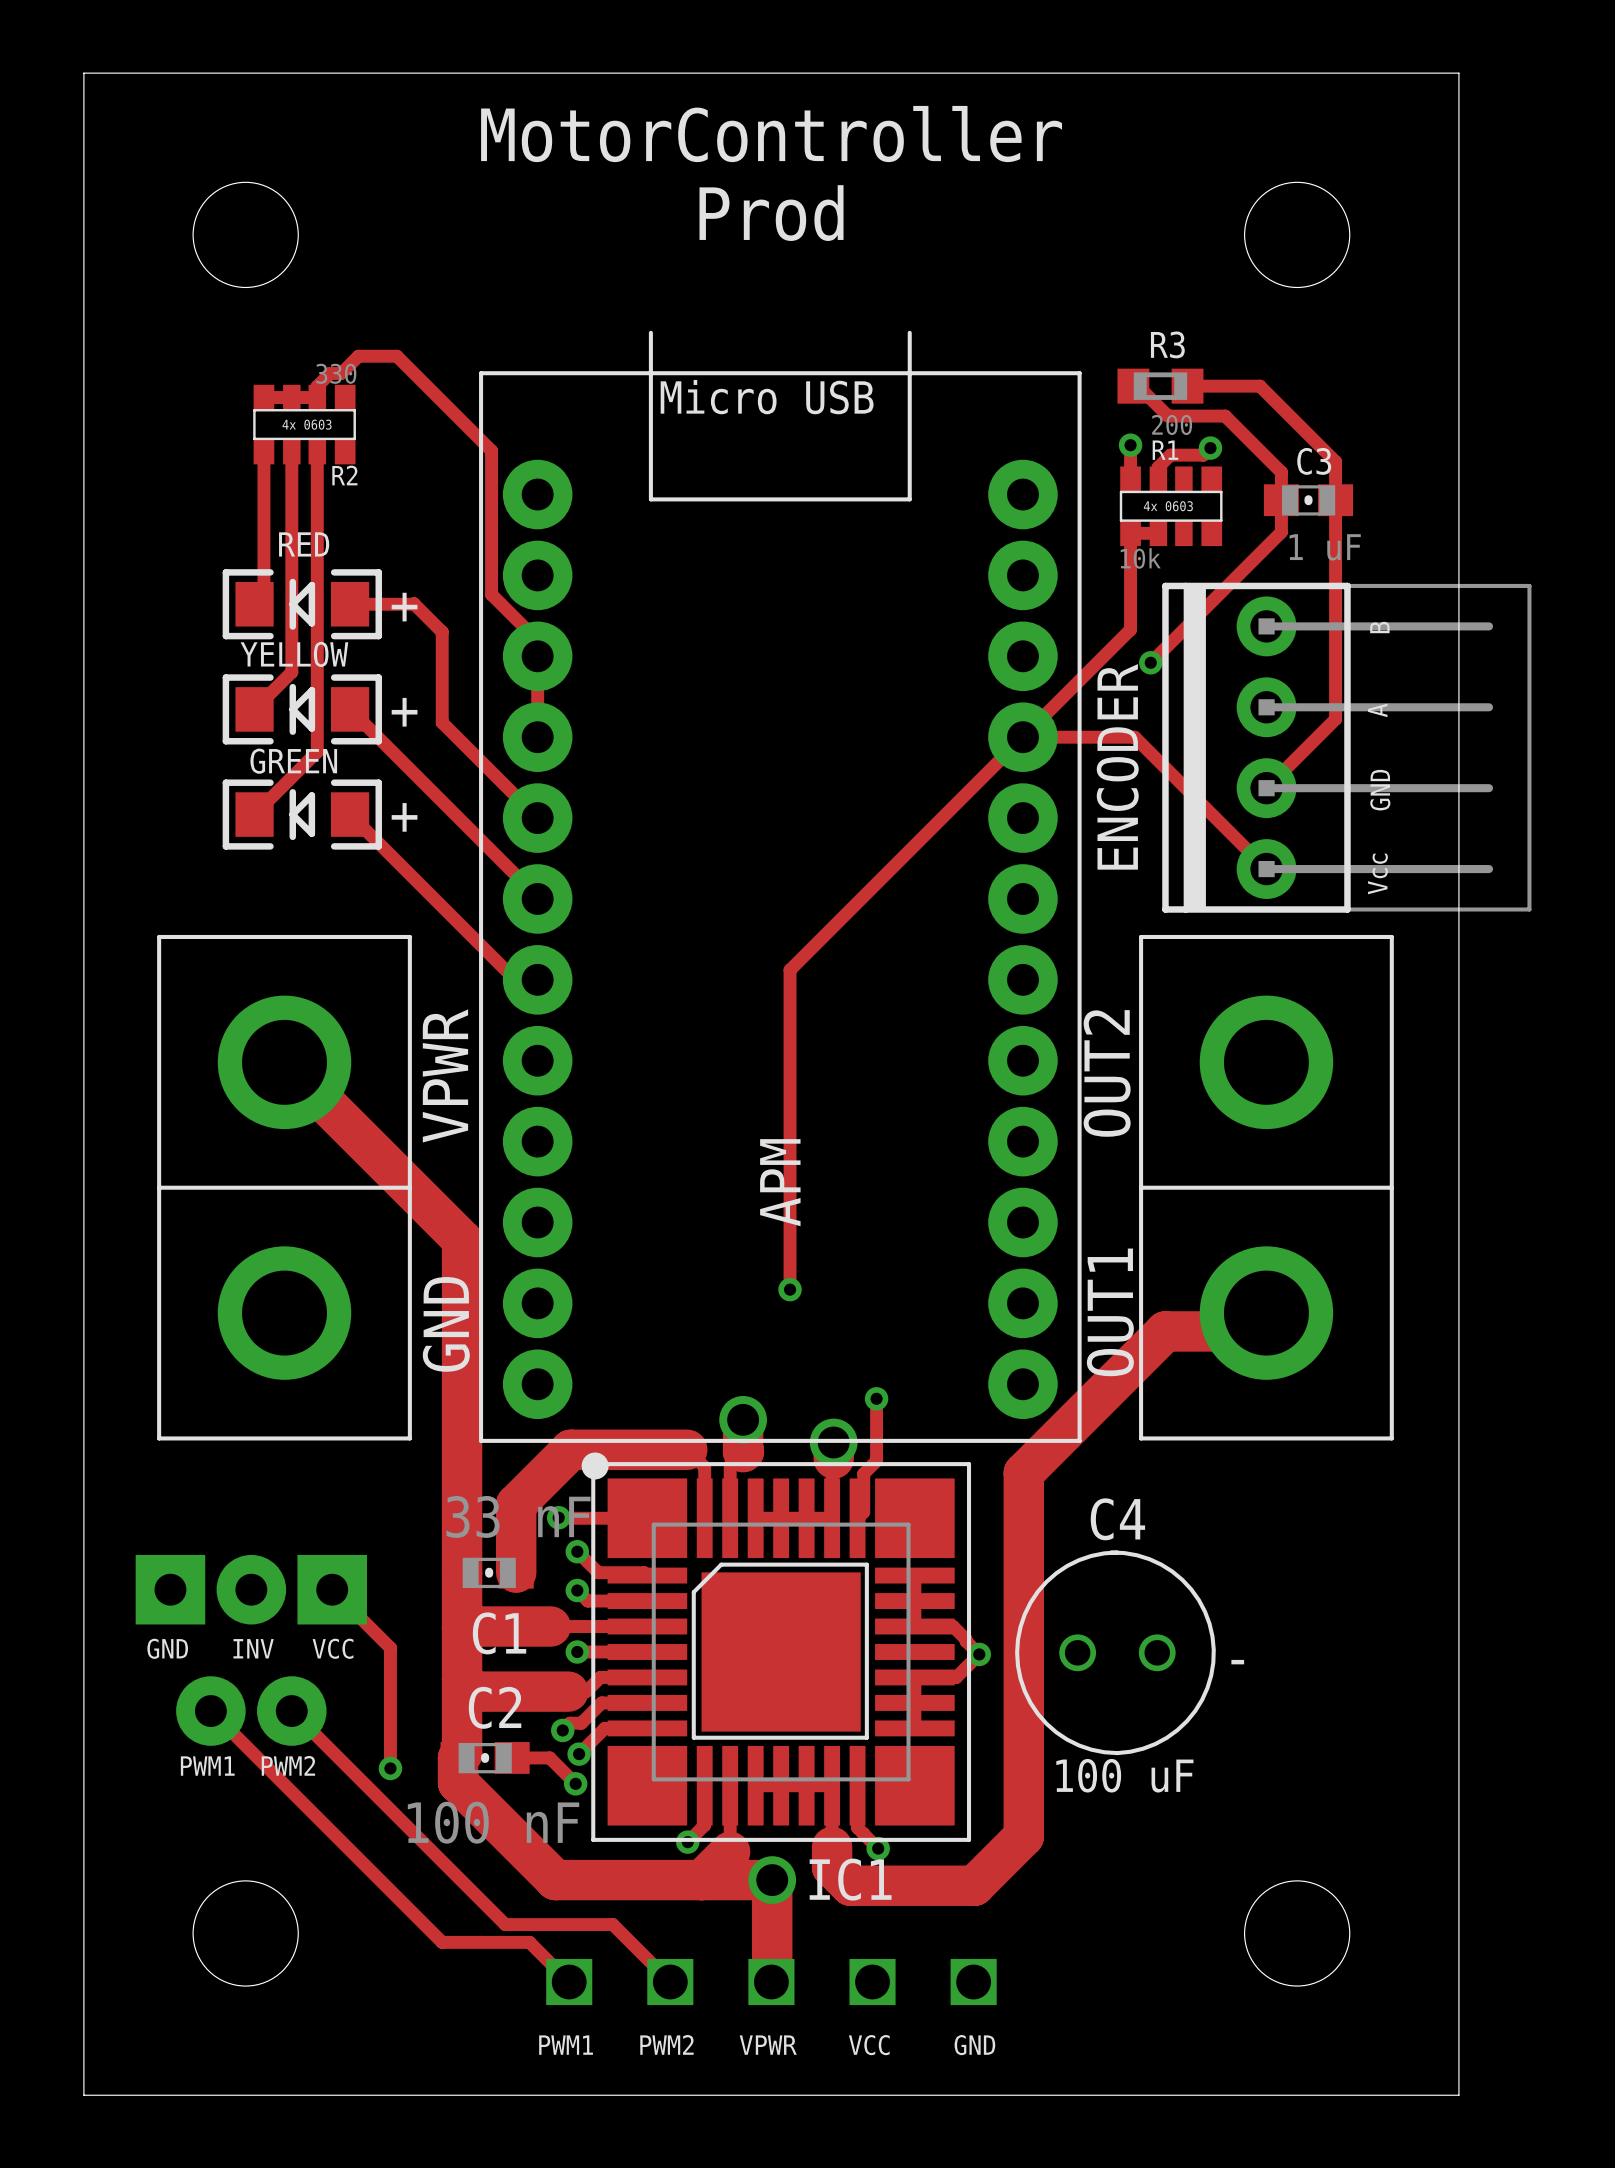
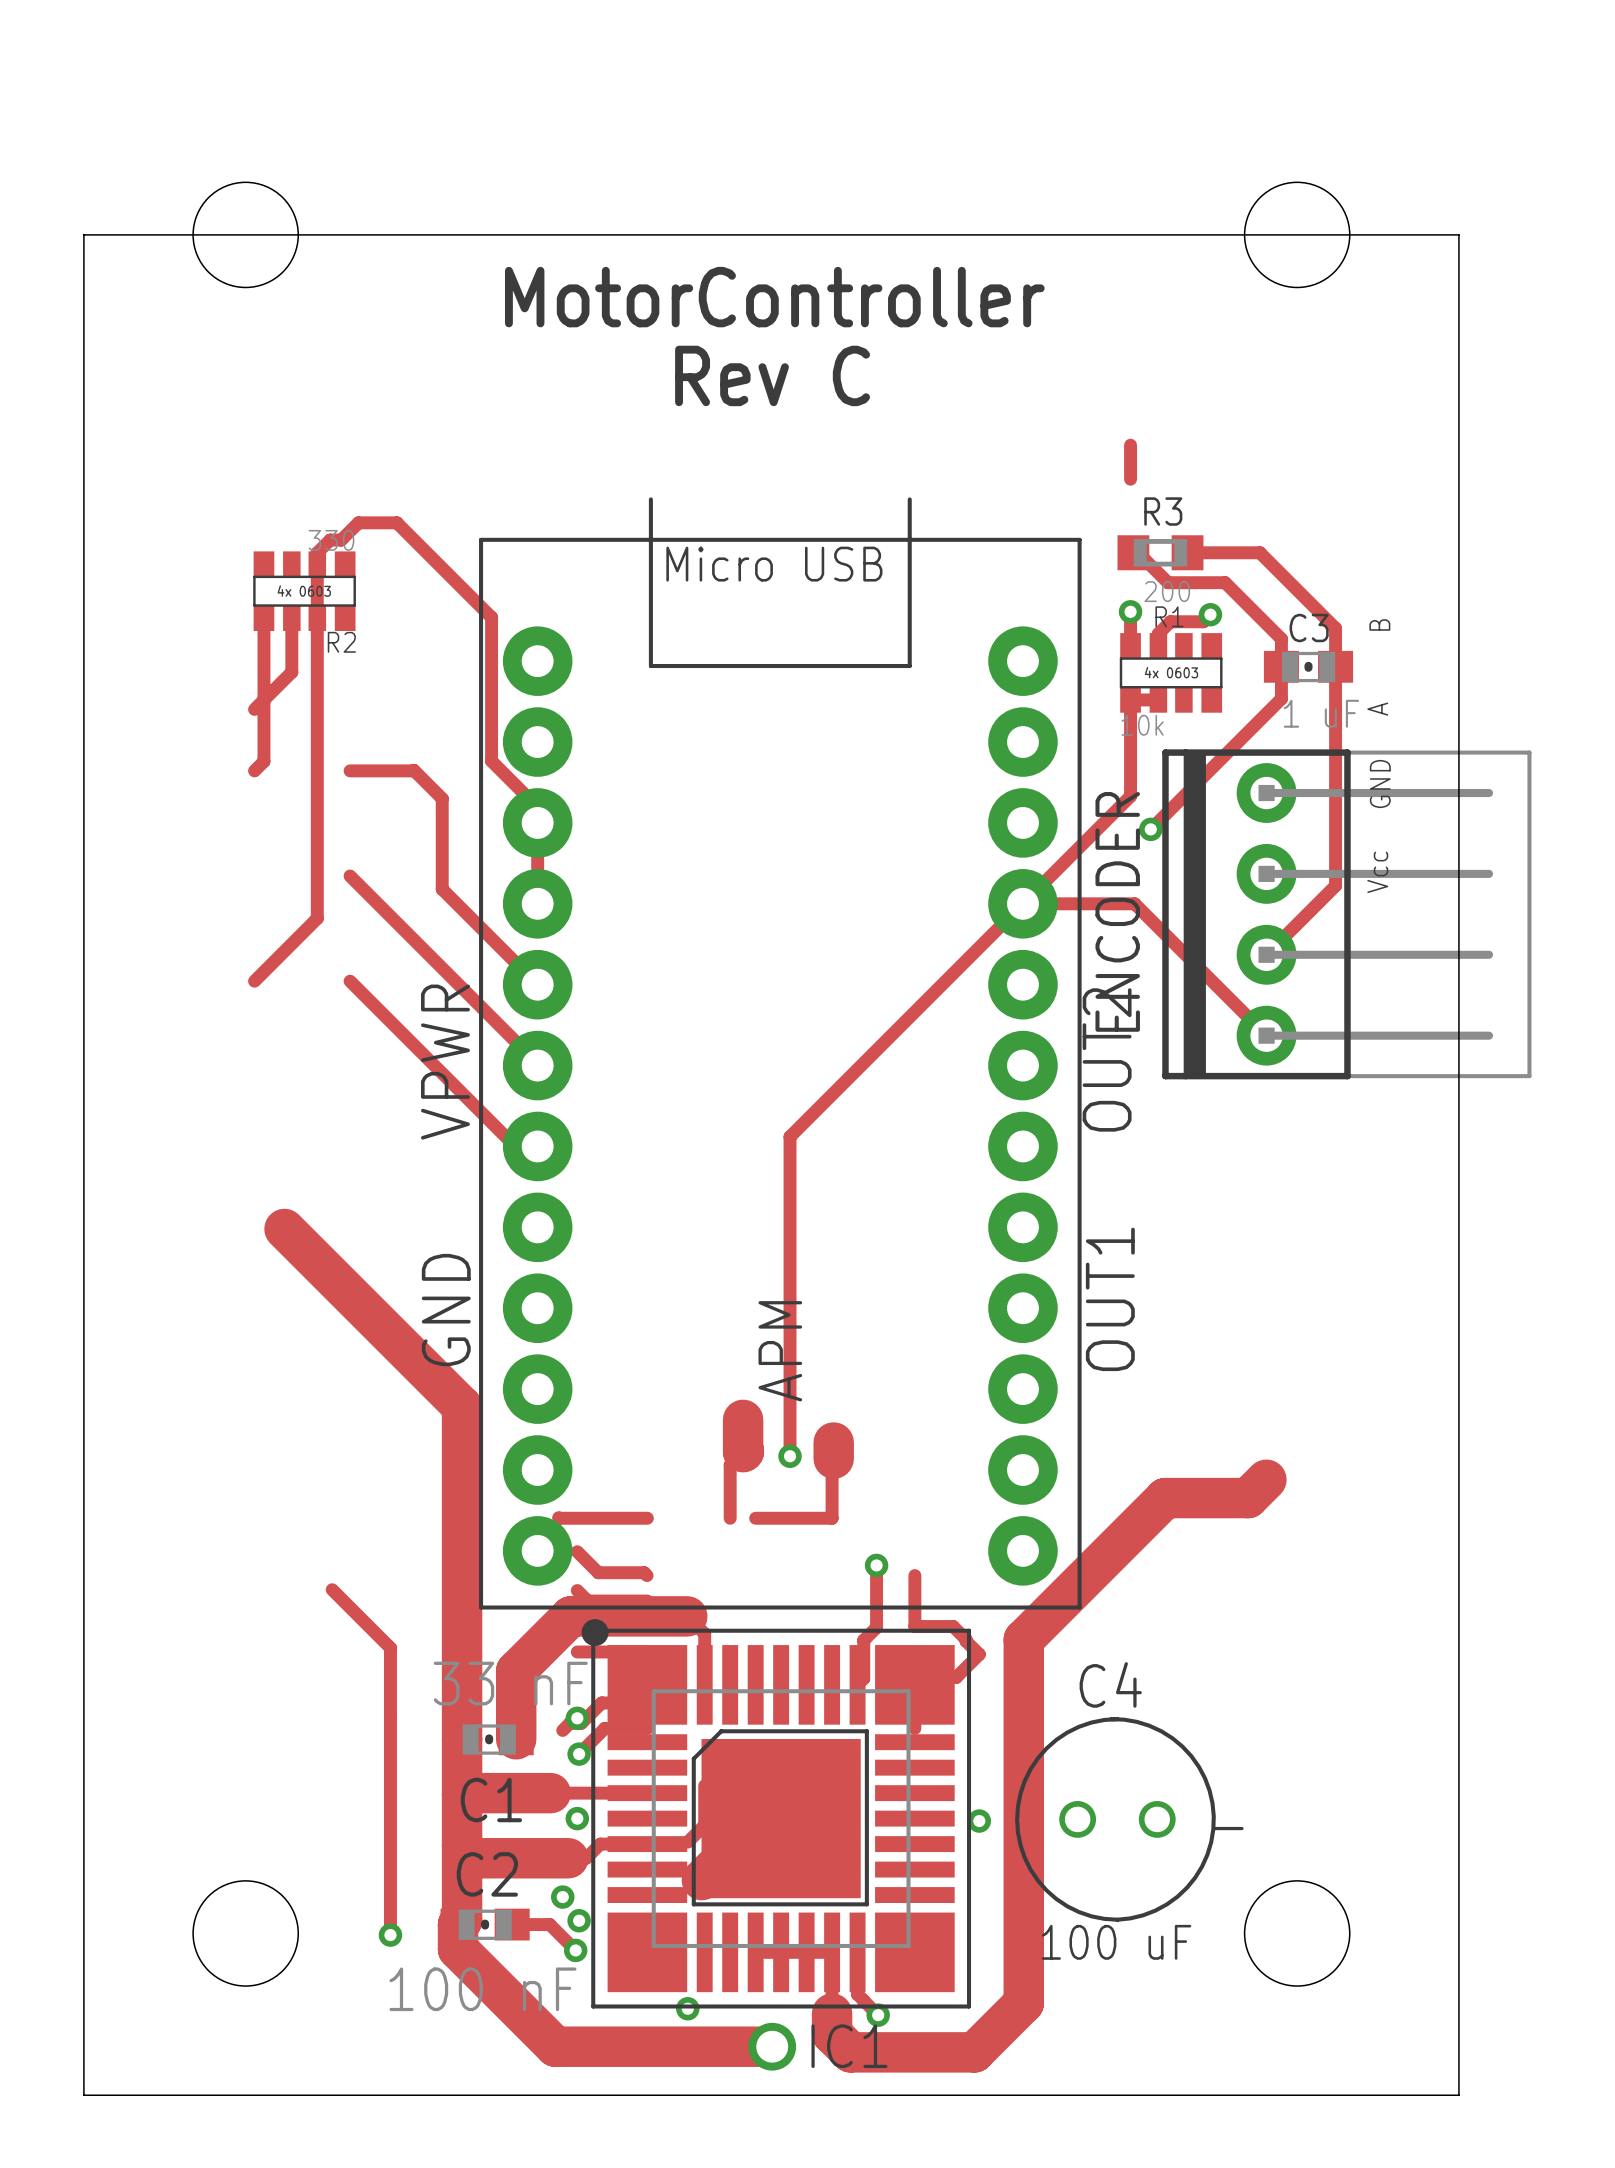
text position: MotorController (771, 134) -> MotorController (774, 297)
text: Prod (771, 213) -> none
board edge: (83, 234) (83, 73) (1458, 73) (1458, 234) -> (83, 234) (1458, 234)
text: none -> Rev C (772, 375)
track: (1133, 386) (1138, 386) (1168, 416) (1225, 416) (1281, 472) (1281, 532) (1150, 662) -> (1133, 552) (1138, 552) (1168, 582) (1225, 582) (1281, 638) (1281, 698) (1150, 829)
R3 position: (1160, 386) -> (1160, 552)
track: (1187, 386) (1259, 386) (1335, 461) (1335, 628) -> (1187, 552) (1259, 552) (1335, 628)
track: (263, 397) (317, 397) (317, 386) (330, 373) (341, 373) (358, 356) (396, 356) (491, 450) (491, 594) (537, 640) (537, 737) -> none
R2 position: (304, 424) -> (304, 591)
via: (1130, 445) -> none
track: (1210, 448) (1203, 455) (1170, 455) (1158, 467) (1158, 479) -> (1210, 614) (1203, 621) (1170, 621) (1158, 633) (1158, 645)
via: (1210, 448) -> none
track: (263, 451) (263, 594) (254, 604) -> (263, 618) (263, 761) (254, 770)
track: (291, 451) (291, 618) -> none
track: (317, 451) (317, 552) -> none
C3 position: (1308, 500) -> (1308, 666)
R1 position: (1171, 506) -> (1171, 672)
track: (1158, 533) (1130, 533) (1130, 611) -> none
part: RED (302, 604) -> none
track: (350, 604) (413, 603) (442, 632) (442, 722) (537, 818) -> (350, 770) (413, 770) (442, 798) (442, 889) (537, 984)
via: none -> (1130, 611)
via: none -> (1210, 614)
track: (1130, 629) (790, 970) (790, 1136) -> (1158, 699) (1130, 699) (1130, 796) (790, 1136)
via: (1150, 662) -> none
part: YELLOW (302, 709) -> none
track: (350, 709) (537, 896) -> (317, 552) (330, 540) (341, 540) (358, 522) (396, 522) (491, 617) (491, 761) (537, 807) (537, 896)
track: (1335, 719) (1266, 788) -> (1335, 719) (1335, 885) (1266, 954)
track: (1022, 737) (1134, 737) (1266, 869) -> (1022, 903) (1134, 903) (1266, 1035)
ENCODER position: (1346, 747) -> (1346, 914)
track: (317, 751) (254, 814) -> (317, 751) (317, 918) (254, 981)
part: GREEN (302, 814) -> none
track: (350, 814) (515, 979) (537, 979) -> (350, 981) (515, 1146) (537, 1146)
via: none -> (1150, 829)
track: none -> (350, 876) (537, 1065)
APM position: (780, 886) -> (780, 1053)
track: (284, 1062) (462, 1239) (462, 1406) -> (284, 1228) (462, 1406)
part: (284, 1187) -> none
part: (1266, 1187) -> none
track: none -> (790, 1289) (790, 1456)
via: (790, 1289) -> none
track: (1266, 1313) (1248, 1331) (1165, 1331) (1023, 1472) (1023, 1639) -> (1266, 1479) (1248, 1498) (1165, 1498) (1023, 1639)
track: (876, 1398) (876, 1460) (863, 1473) (863, 1512) (857, 1518) -> (876, 1565) (876, 1627) (863, 1640) (863, 1678) (857, 1684)
via: (876, 1398) -> none
via: (743, 1419) -> none
via: (833, 1442) -> none
via: none -> (790, 1456)
via: (558, 1517) -> none
track: (704, 1518) (704, 1467) (687, 1449) (570, 1449) (516, 1504) (516, 1572) -> (704, 1684) (704, 1633) (687, 1616) (570, 1616) (516, 1671) (516, 1739)
via: (577, 1551) -> none
via: none -> (876, 1565)
C1 position: (489, 1572) -> (489, 1739)
via: (577, 1590) -> none
track: (647, 1626) (462, 1627) -> (647, 1793) (462, 1794)
IC1 position: (776, 1647) -> (776, 1813)
part: (251, 1650) -> none
via: (577, 1651) -> none
C4 position: (1115, 1652) -> (1115, 1819)
via: (979, 1654) -> none
track: (647, 1677) (600, 1677) (586, 1691) (474, 1691) (462, 1679) -> (647, 1844) (600, 1844) (586, 1858) (474, 1858) (462, 1846)
track: (210, 1711) (442, 1942) (529, 1942) (569, 1982) -> none
track: (291, 1711) (505, 1924) (512, 1924) -> none
via position: (562, 1730) -> (577, 1718)
track: (462, 1753) (458, 1757) (458, 1782) (555, 1880) (772, 1880) (771, 1982) -> (462, 1753) (462, 1920) (458, 1924) (458, 1949) (555, 2046) (772, 2046)
C2 position: (485, 1757) -> (485, 1924)
track: (512, 1757) (549, 1757) (575, 1783) -> none
track: none -> (390, 1768) (390, 1935)
via: (390, 1768) -> none
via: (575, 1783) -> none
track: (755, 1785) (832, 1785) (832, 1867) (850, 1885) (974, 1885) (1023, 1836) -> (755, 1952) (832, 1952) (832, 2033) (850, 2052) (974, 2052) (1023, 2003) (1023, 1836)
via: none -> (577, 1818)
via: none -> (979, 1821)
via: (687, 1842) -> none
via: (878, 1848) -> none
via position: (772, 1880) -> (772, 2046)
via: none -> (562, 1897)
via: none -> (579, 1920)
track: (549, 1924) (612, 1924) (670, 1982) -> (549, 1924) (575, 1950)
via: none -> (390, 1935)
via: none -> (575, 1950)
part: (771, 1982) -> none
via: none -> (687, 2008)
via: none -> (878, 2015)

